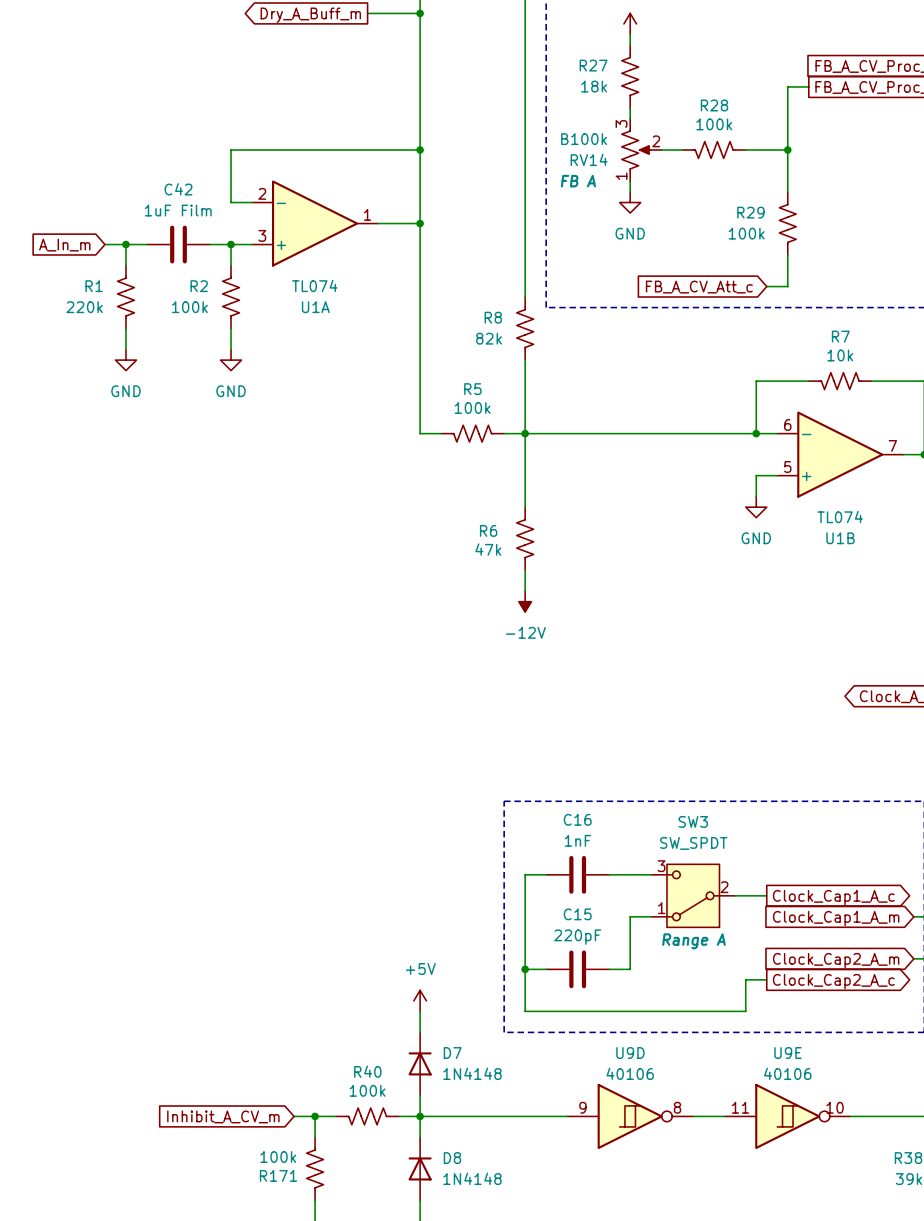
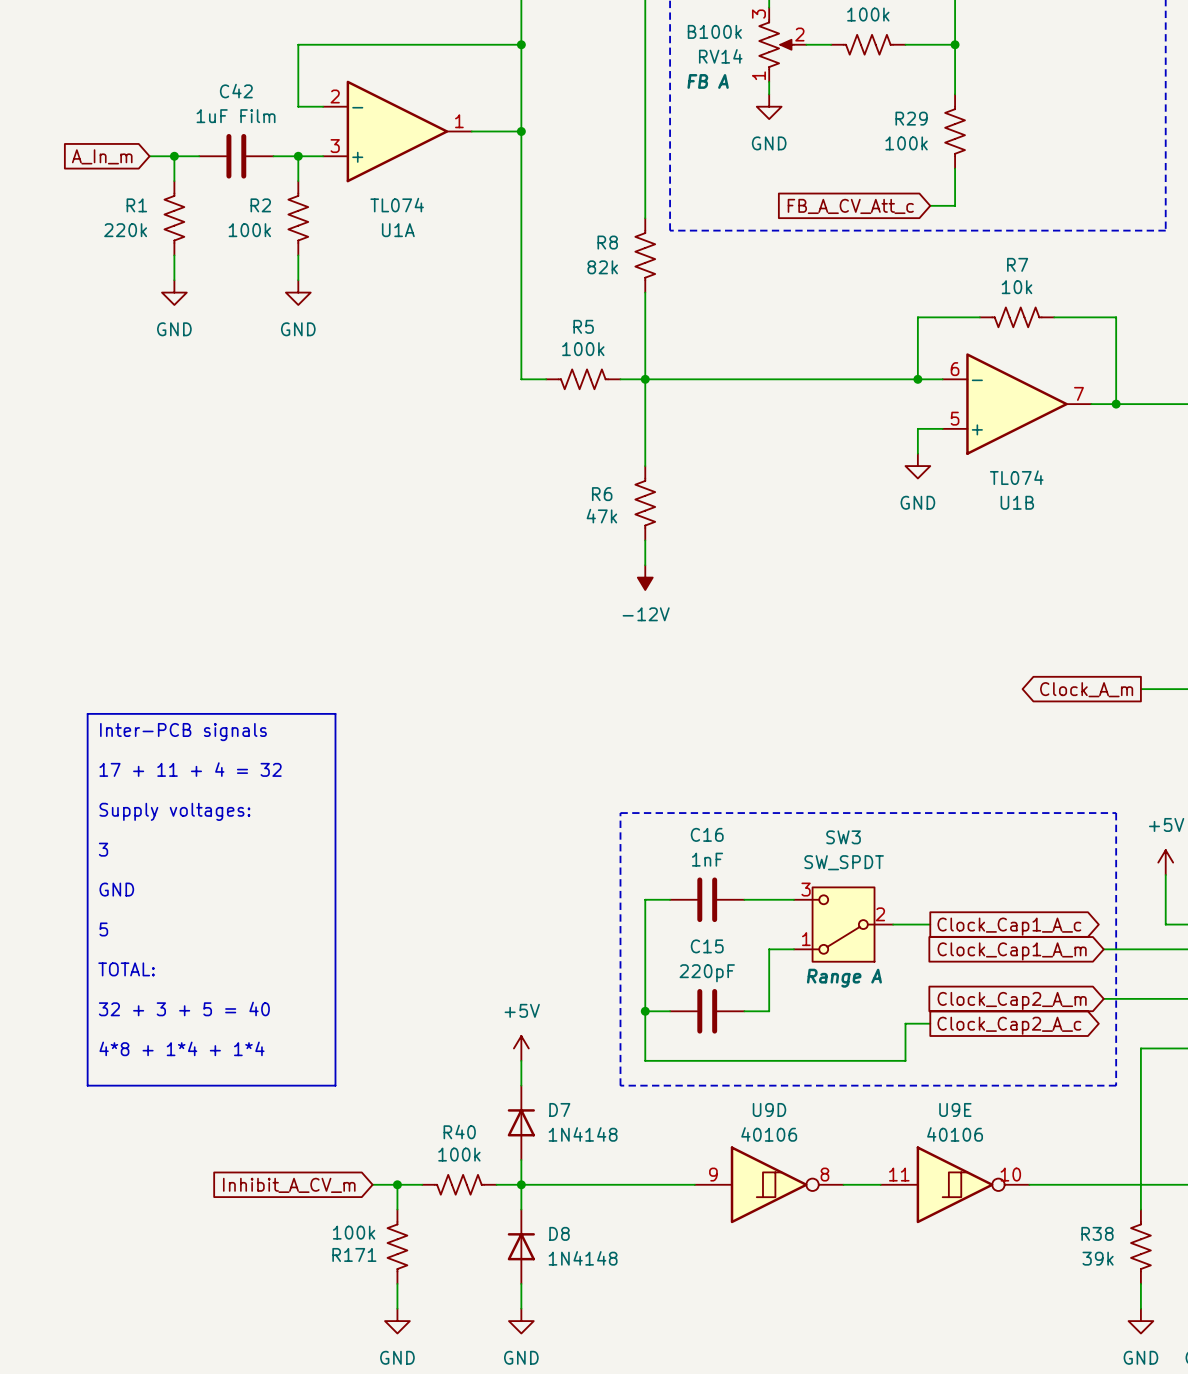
line: none -> (87, 713) (335, 713) (335, 1085) (87, 1085) (87, 713)
text: none -> Inter-PCB signals (183, 732)
text: none -> 17 + 11 + 4 = 32 (190, 769)
text: none -> Supply voltages: (174, 811)
text: none -> 3 (103, 849)
text: none -> GND (116, 889)
text: none -> 5 (103, 929)
text: none -> TOTAL: (126, 969)
text: none -> 32 + 3 + 5 = 40 (184, 1008)
text: none -> 4*8 + 1*4 + 1*4 (182, 1048)

